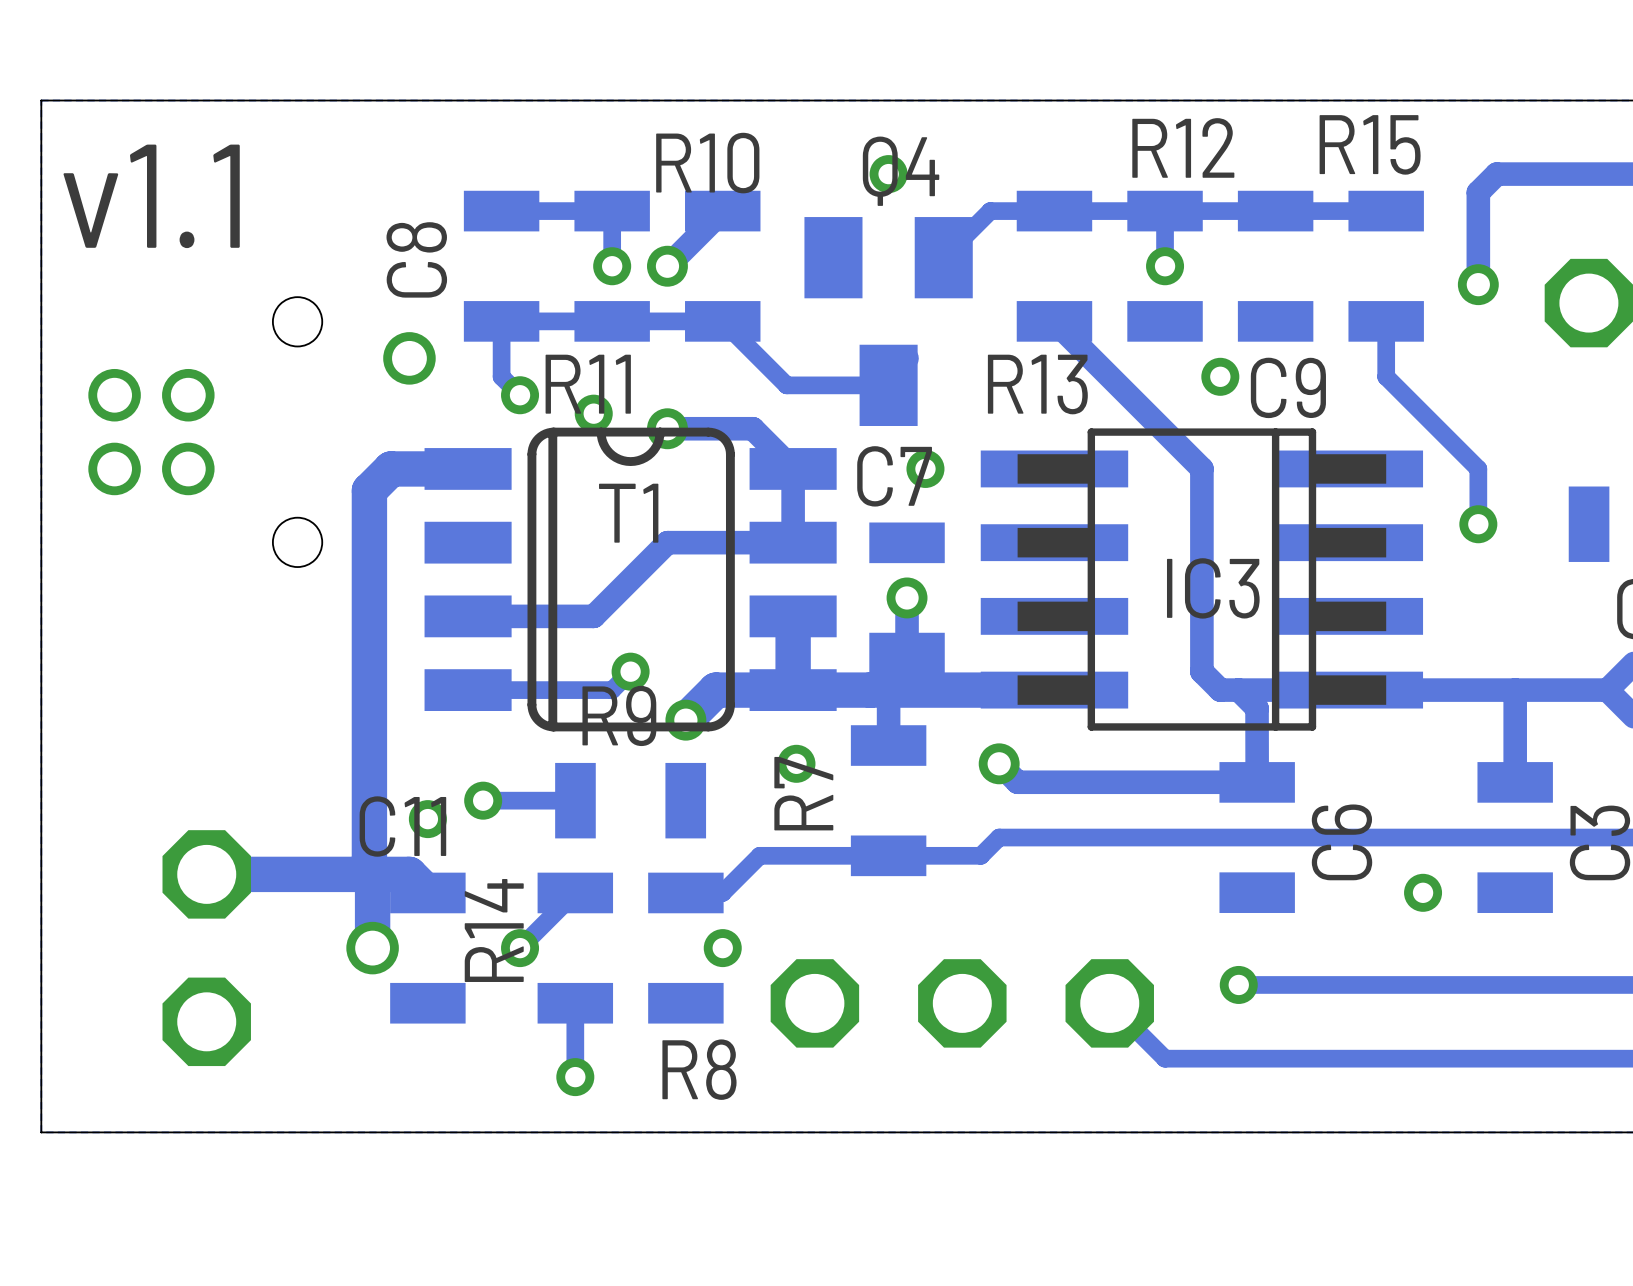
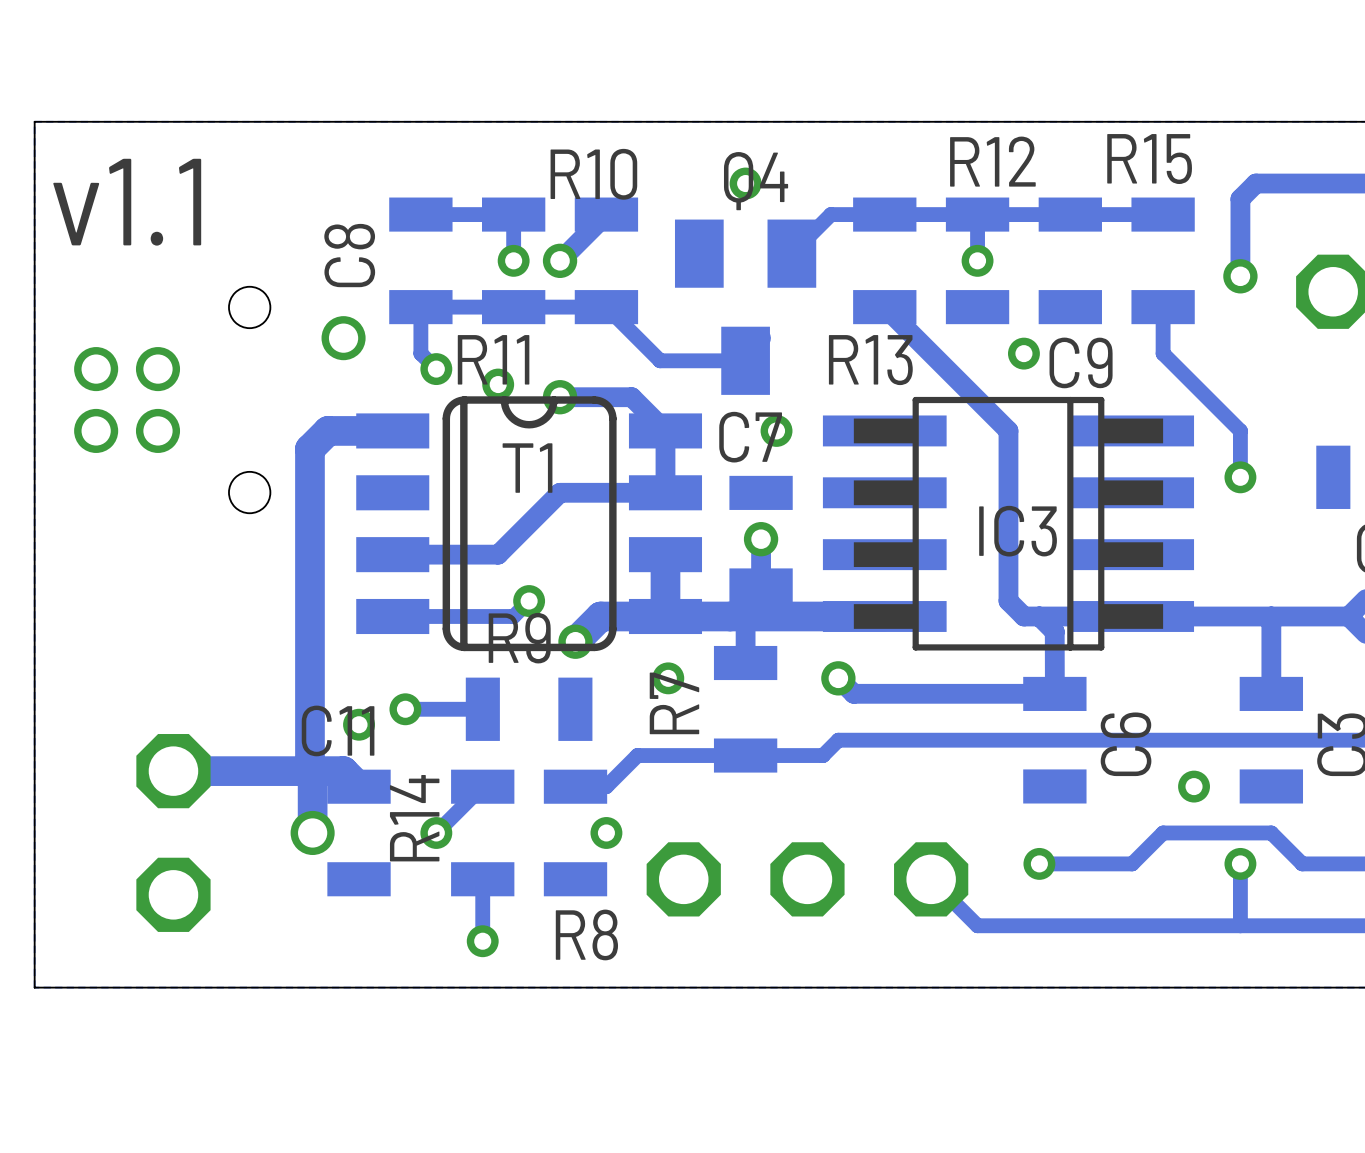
track: none -> (1240, 863) (1240, 925)
via: none -> (1240, 863)
track: (1552, 984) (1349, 984) -> (1302, 863) (1271, 832) (1163, 832) (1132, 863)

